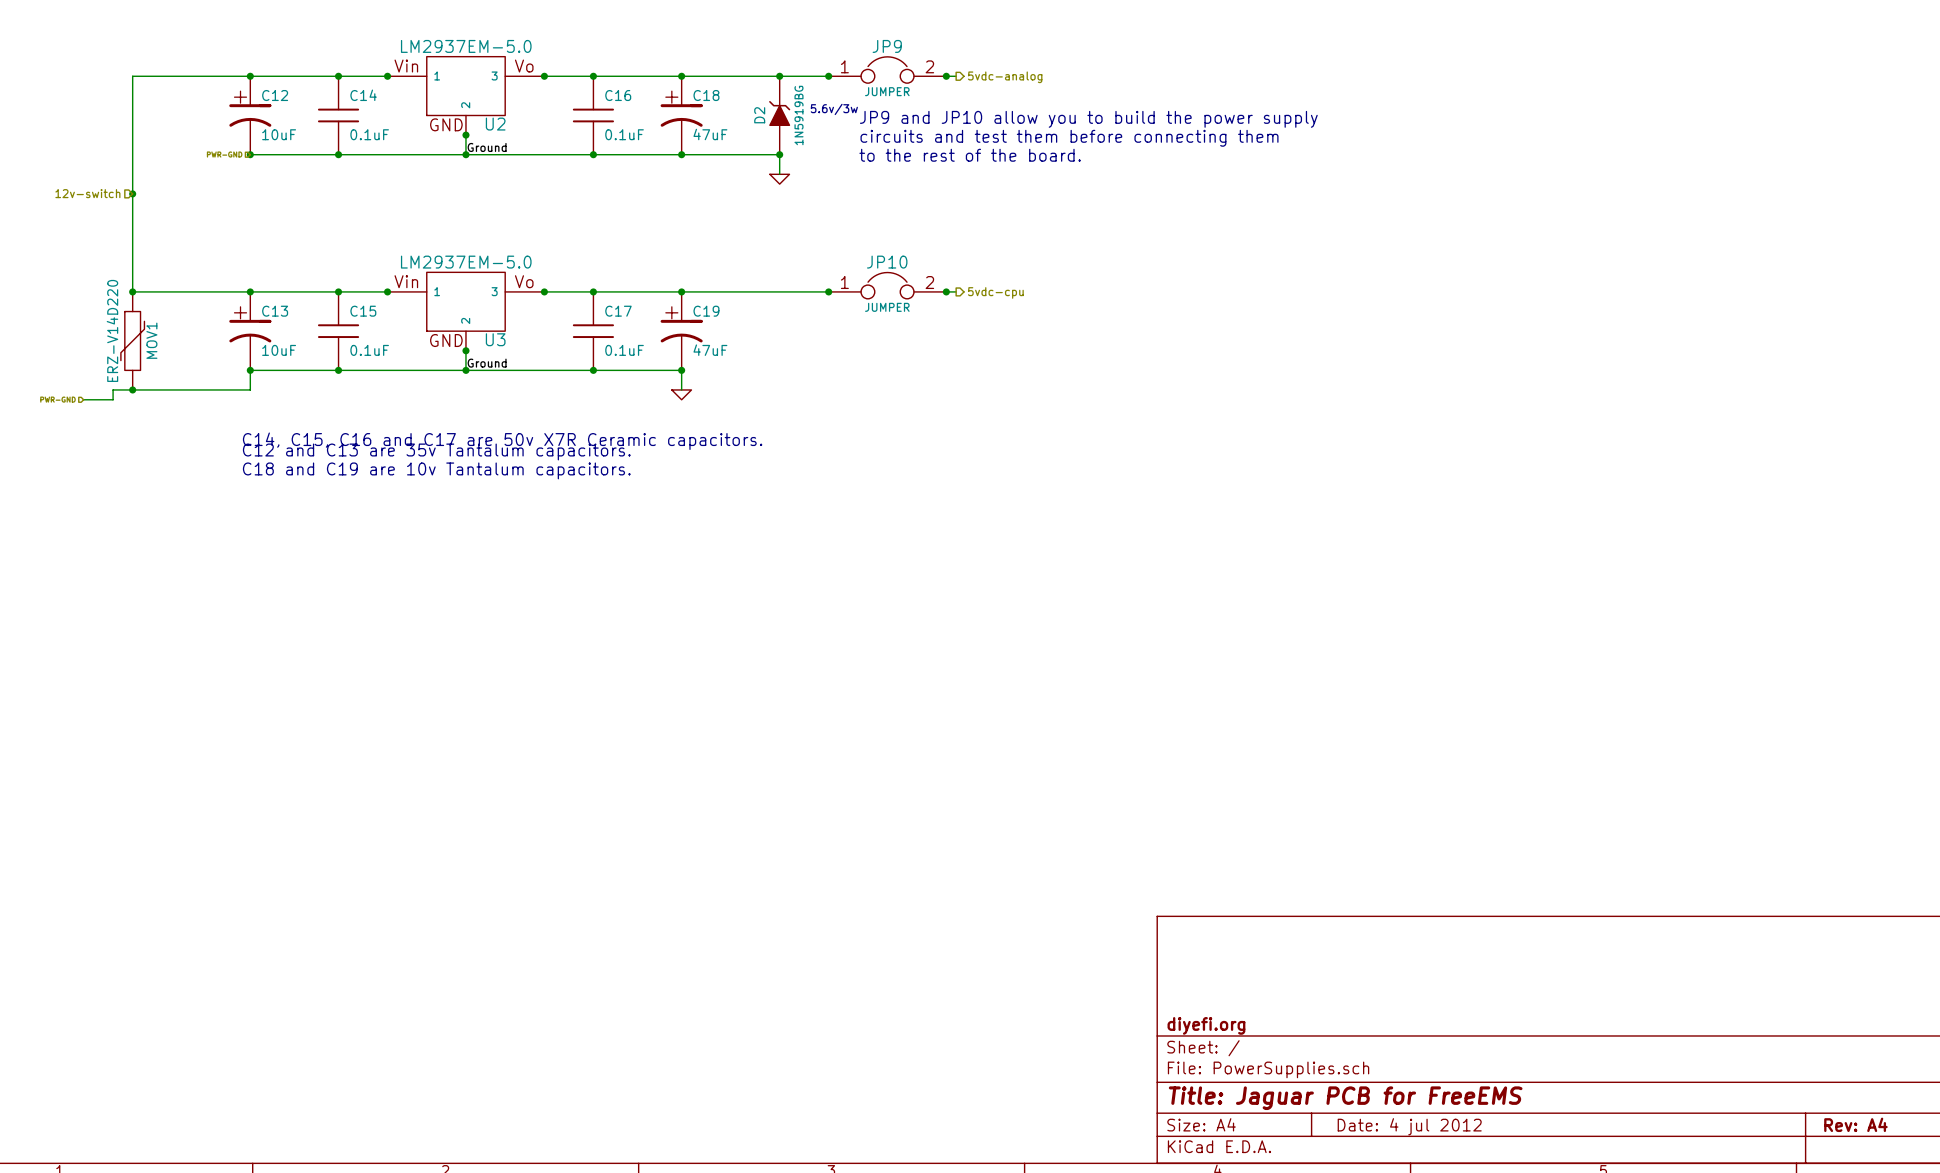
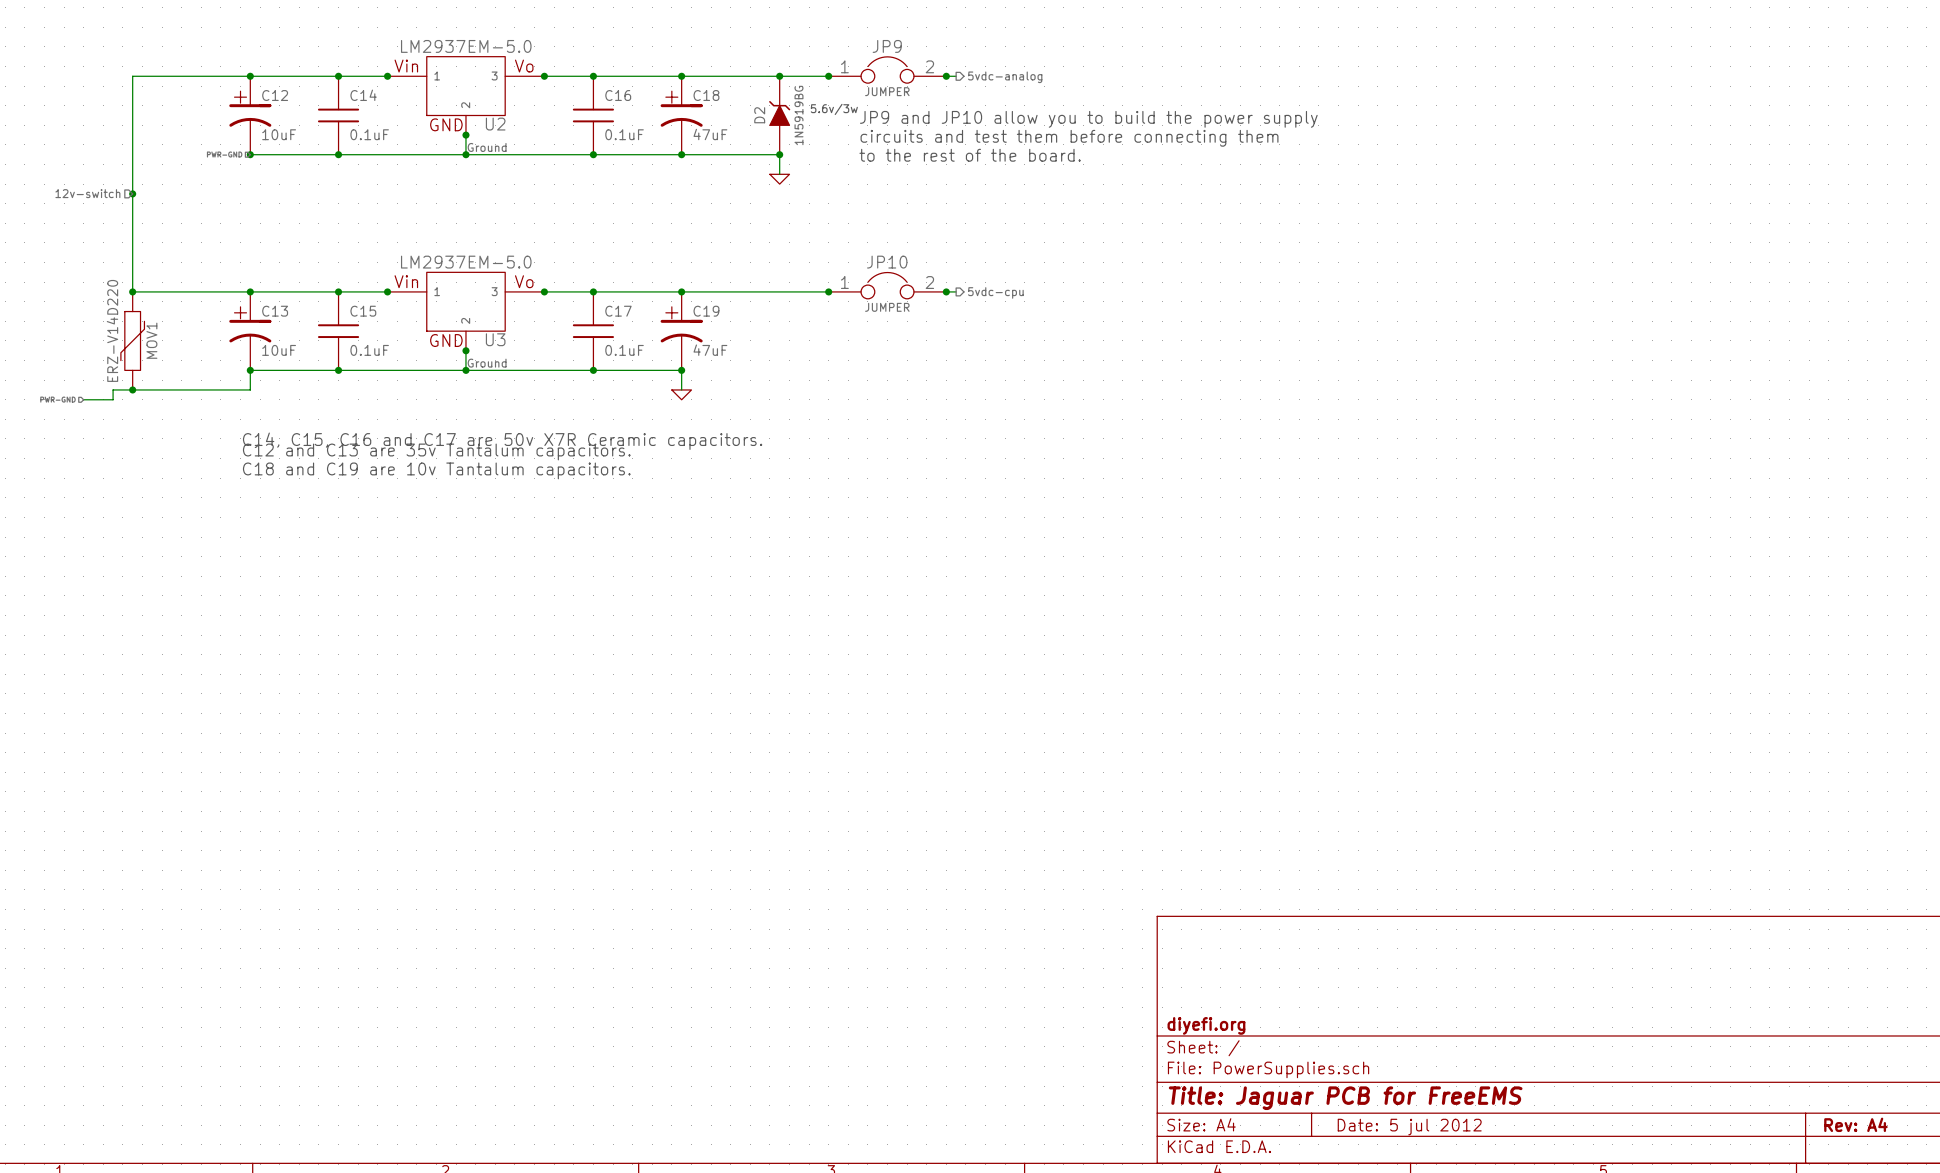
title block: Date: 4 jul 2012 (1409, 1126) -> Date: 5 jul 2012 (1409, 1127)

